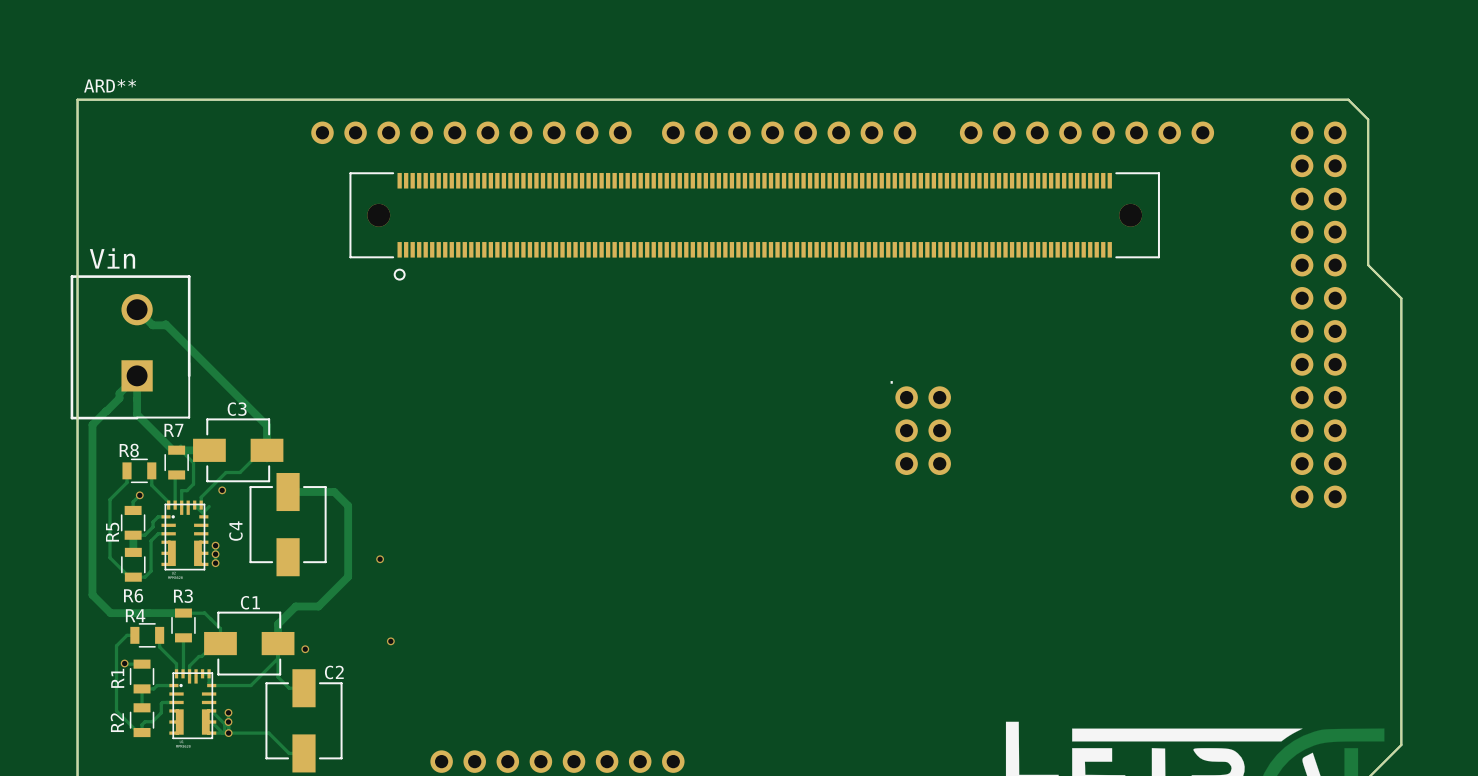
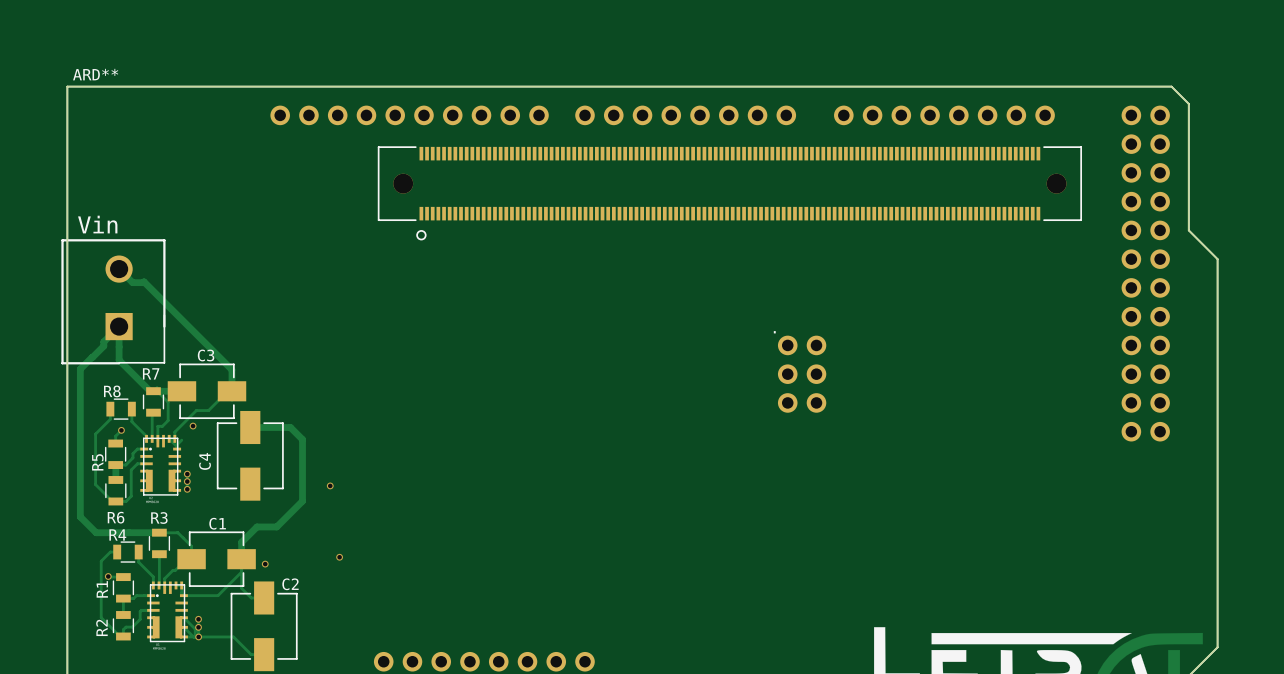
part position: (754, 226) -> (729, 193)

